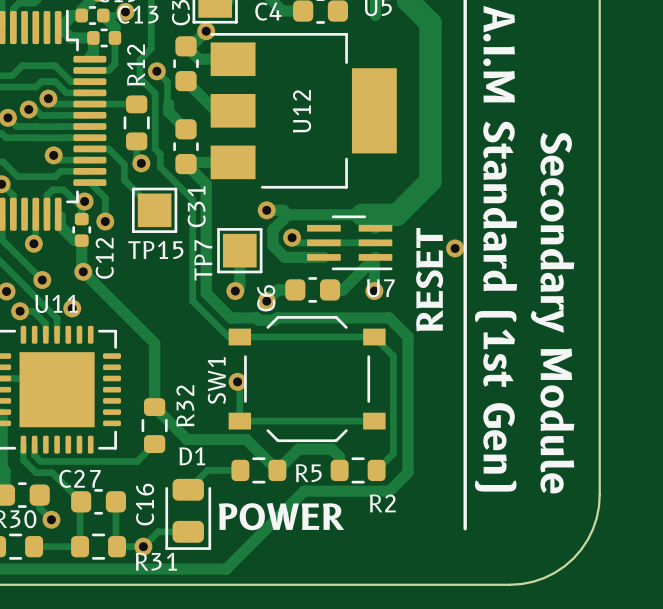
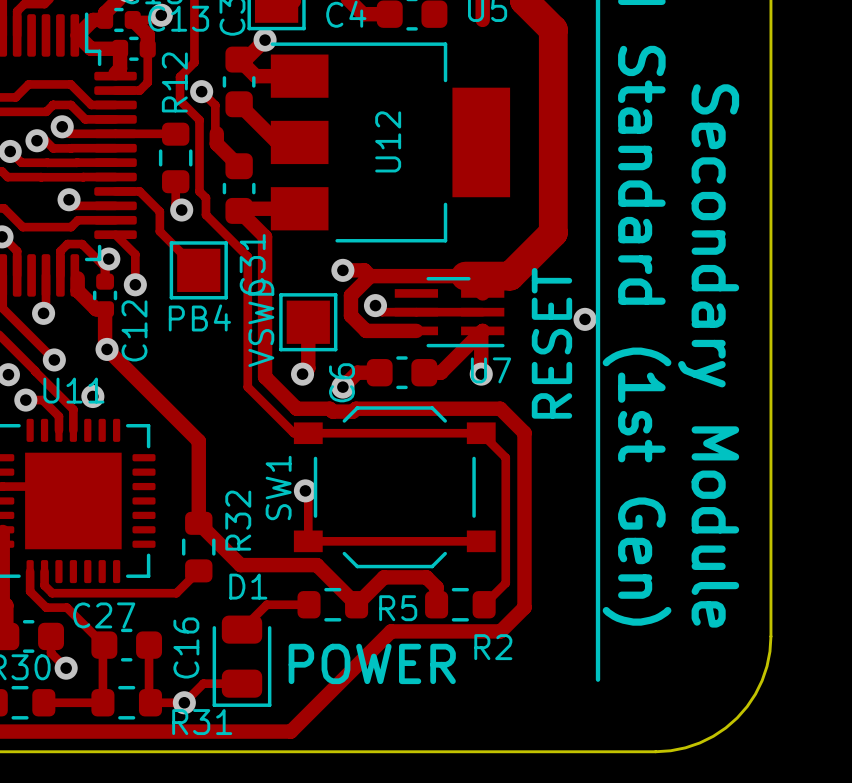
TP15 value: none -> PB4 (199, 317)
TP15 name: TP15 (155, 250) -> none
TP7 value: none -> VSWD (261, 323)
TP7 name: TP7 (203, 260) -> none

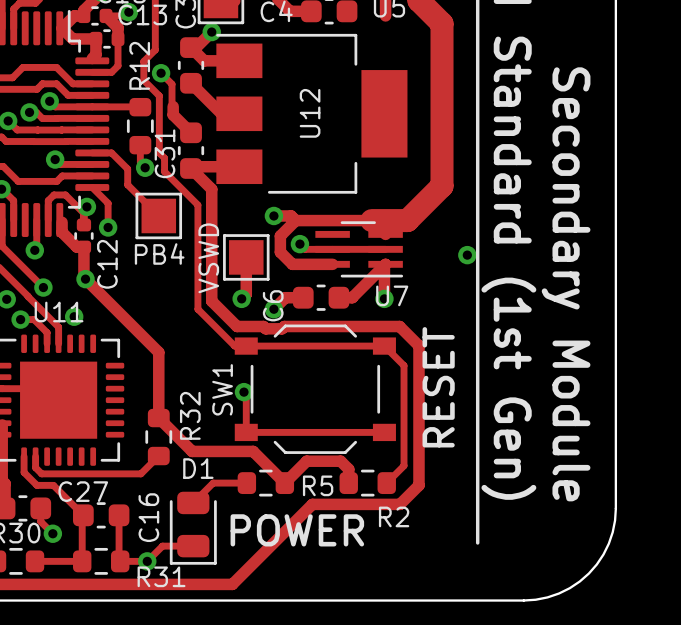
C31 name position: C31 (252, 264) -> C31 (165, 153)
text position: RESET (551, 343) -> RESET (438, 387)

